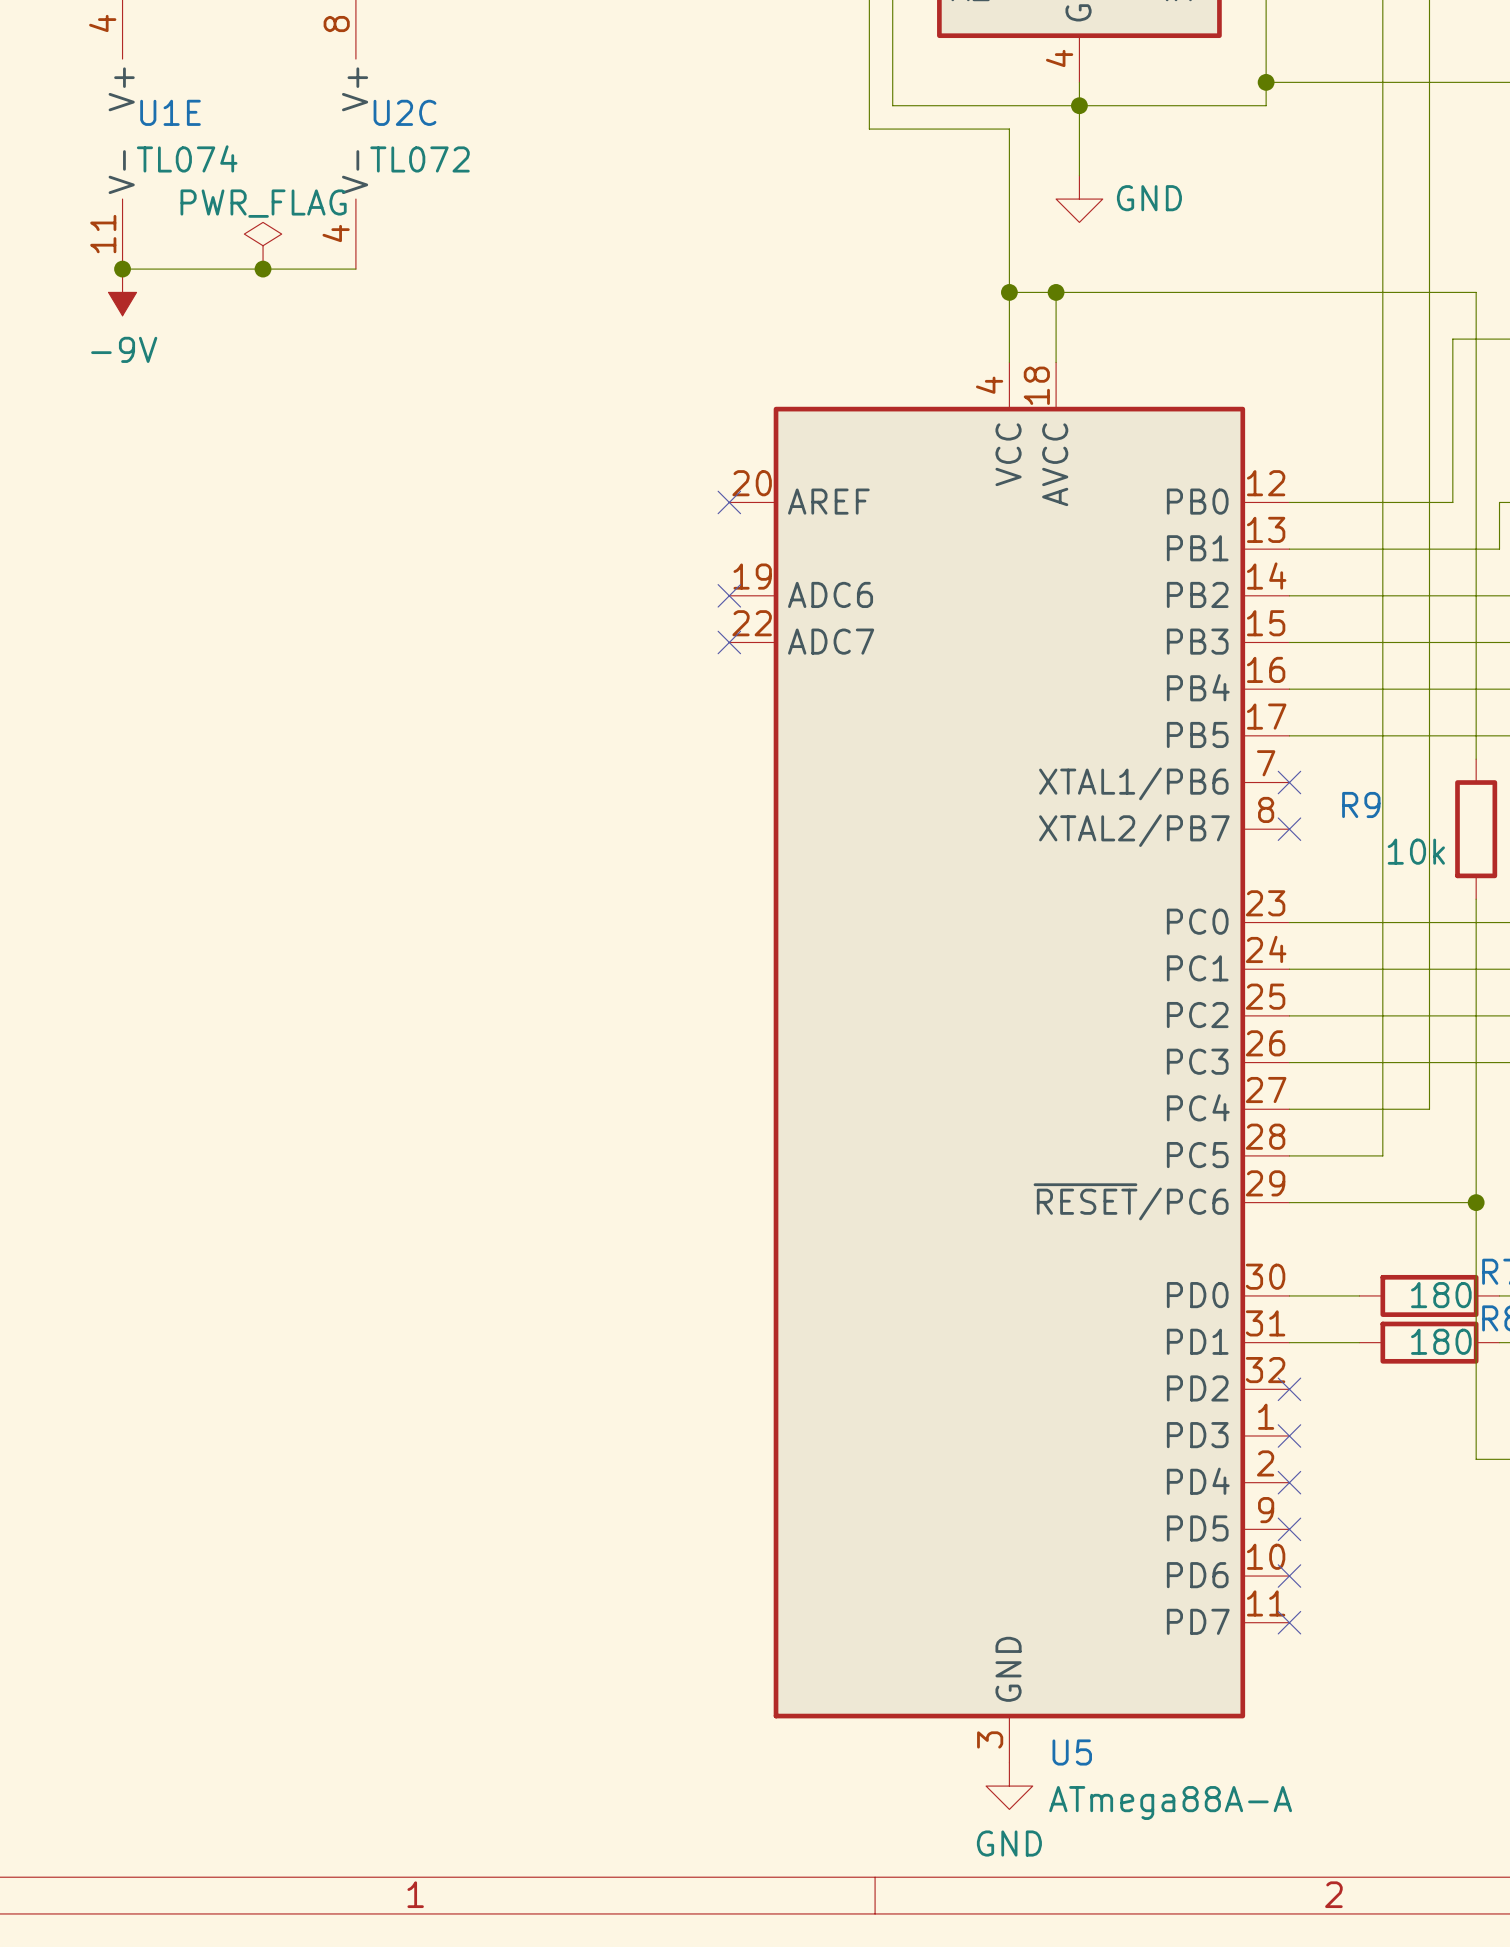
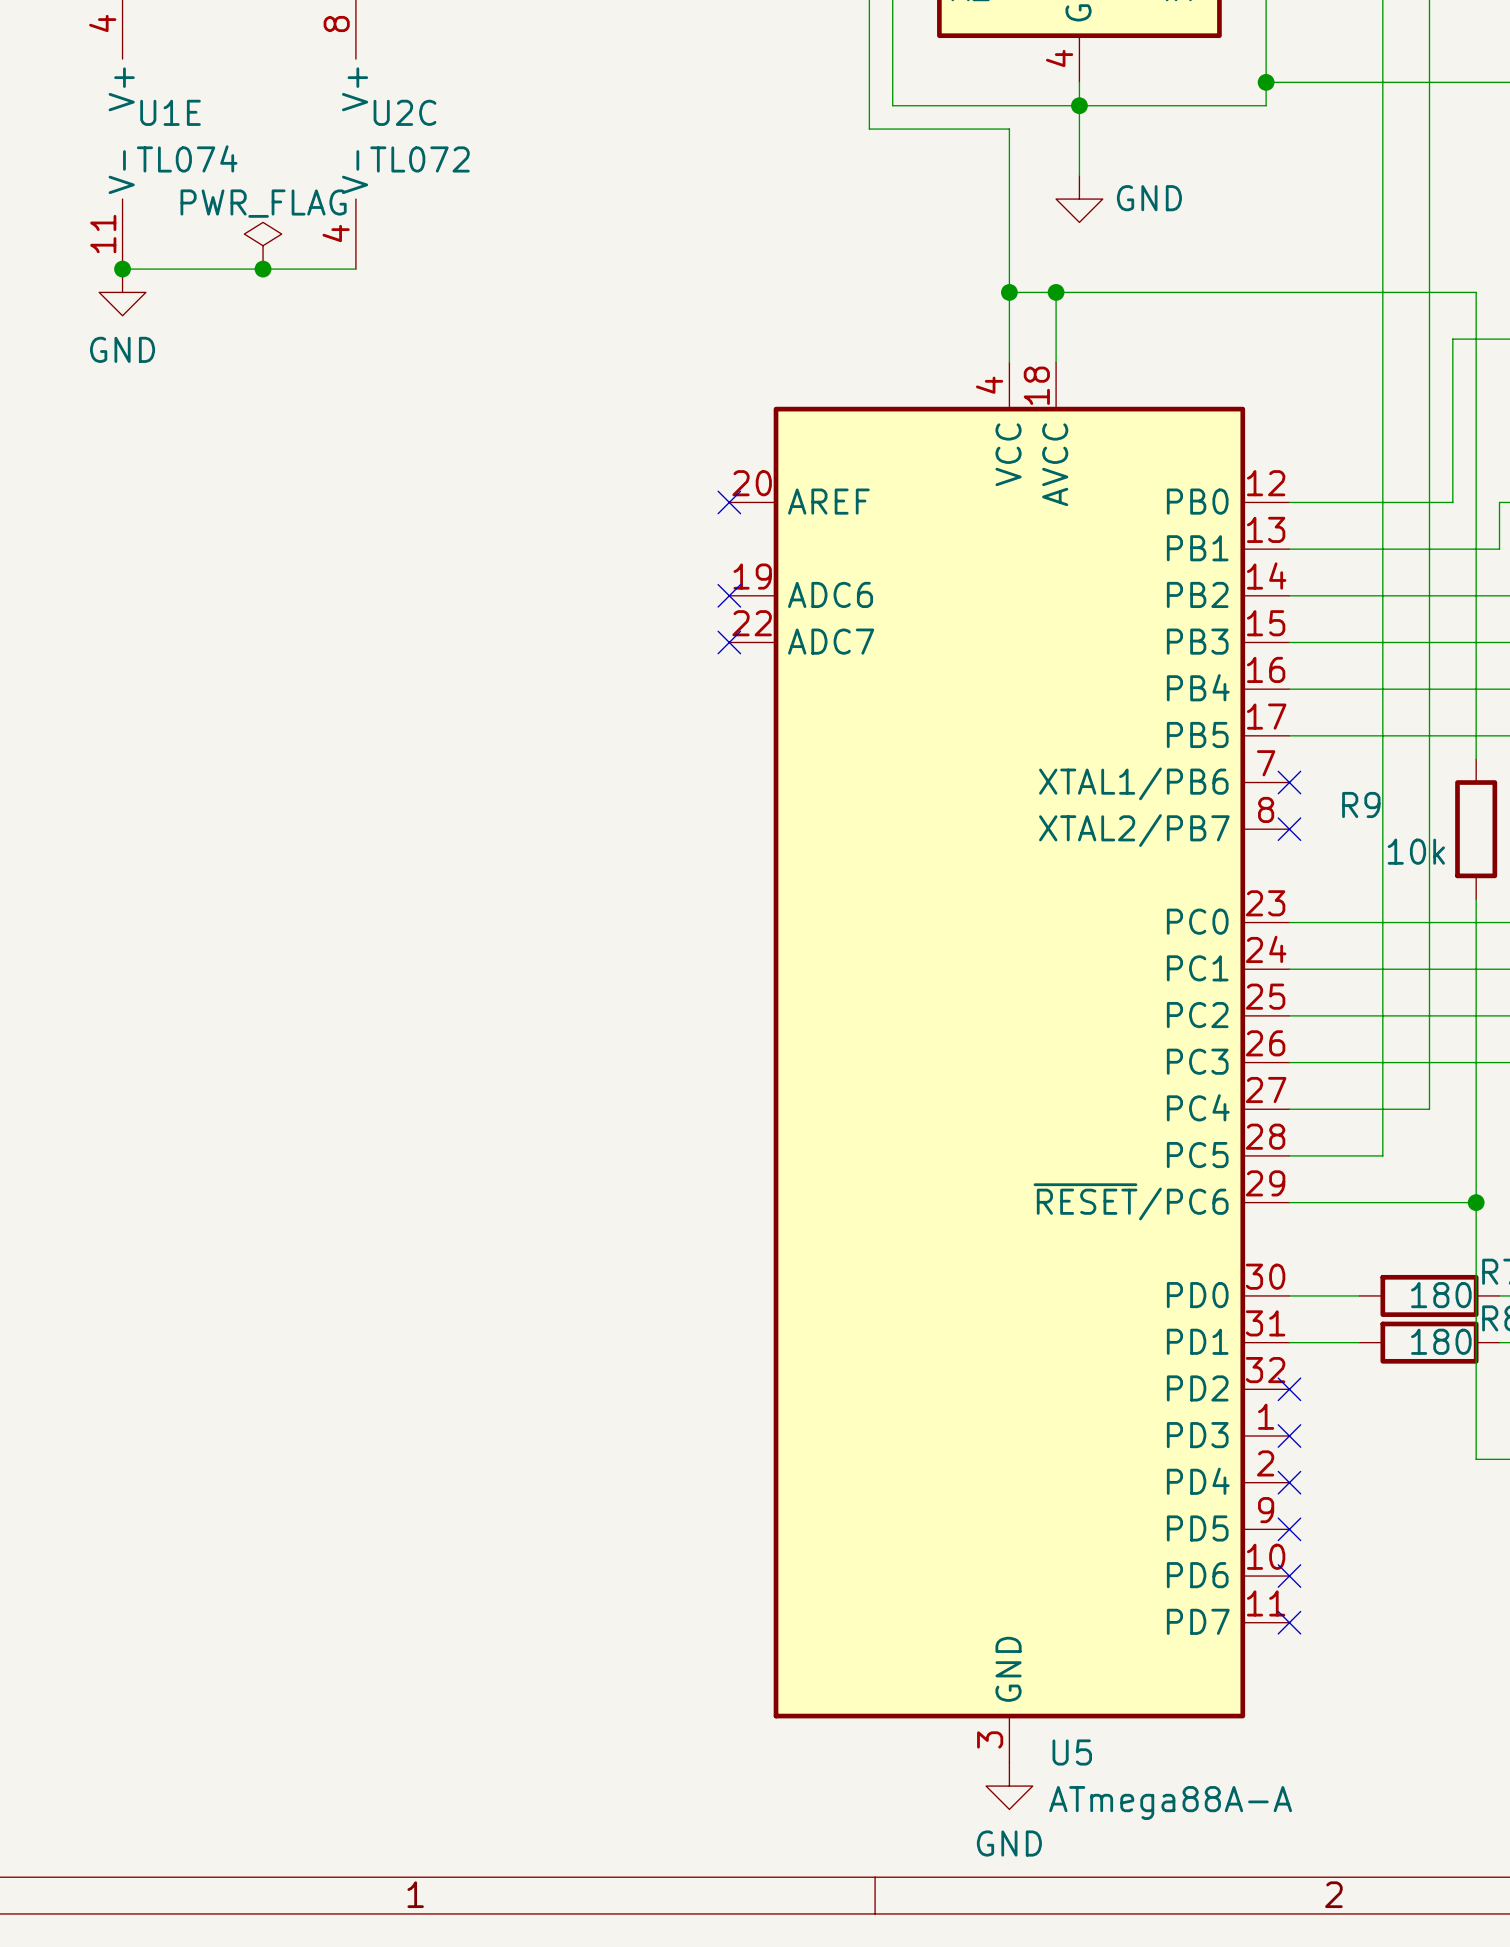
power symbol: -9V (122, 292) -> GND (122, 292)

